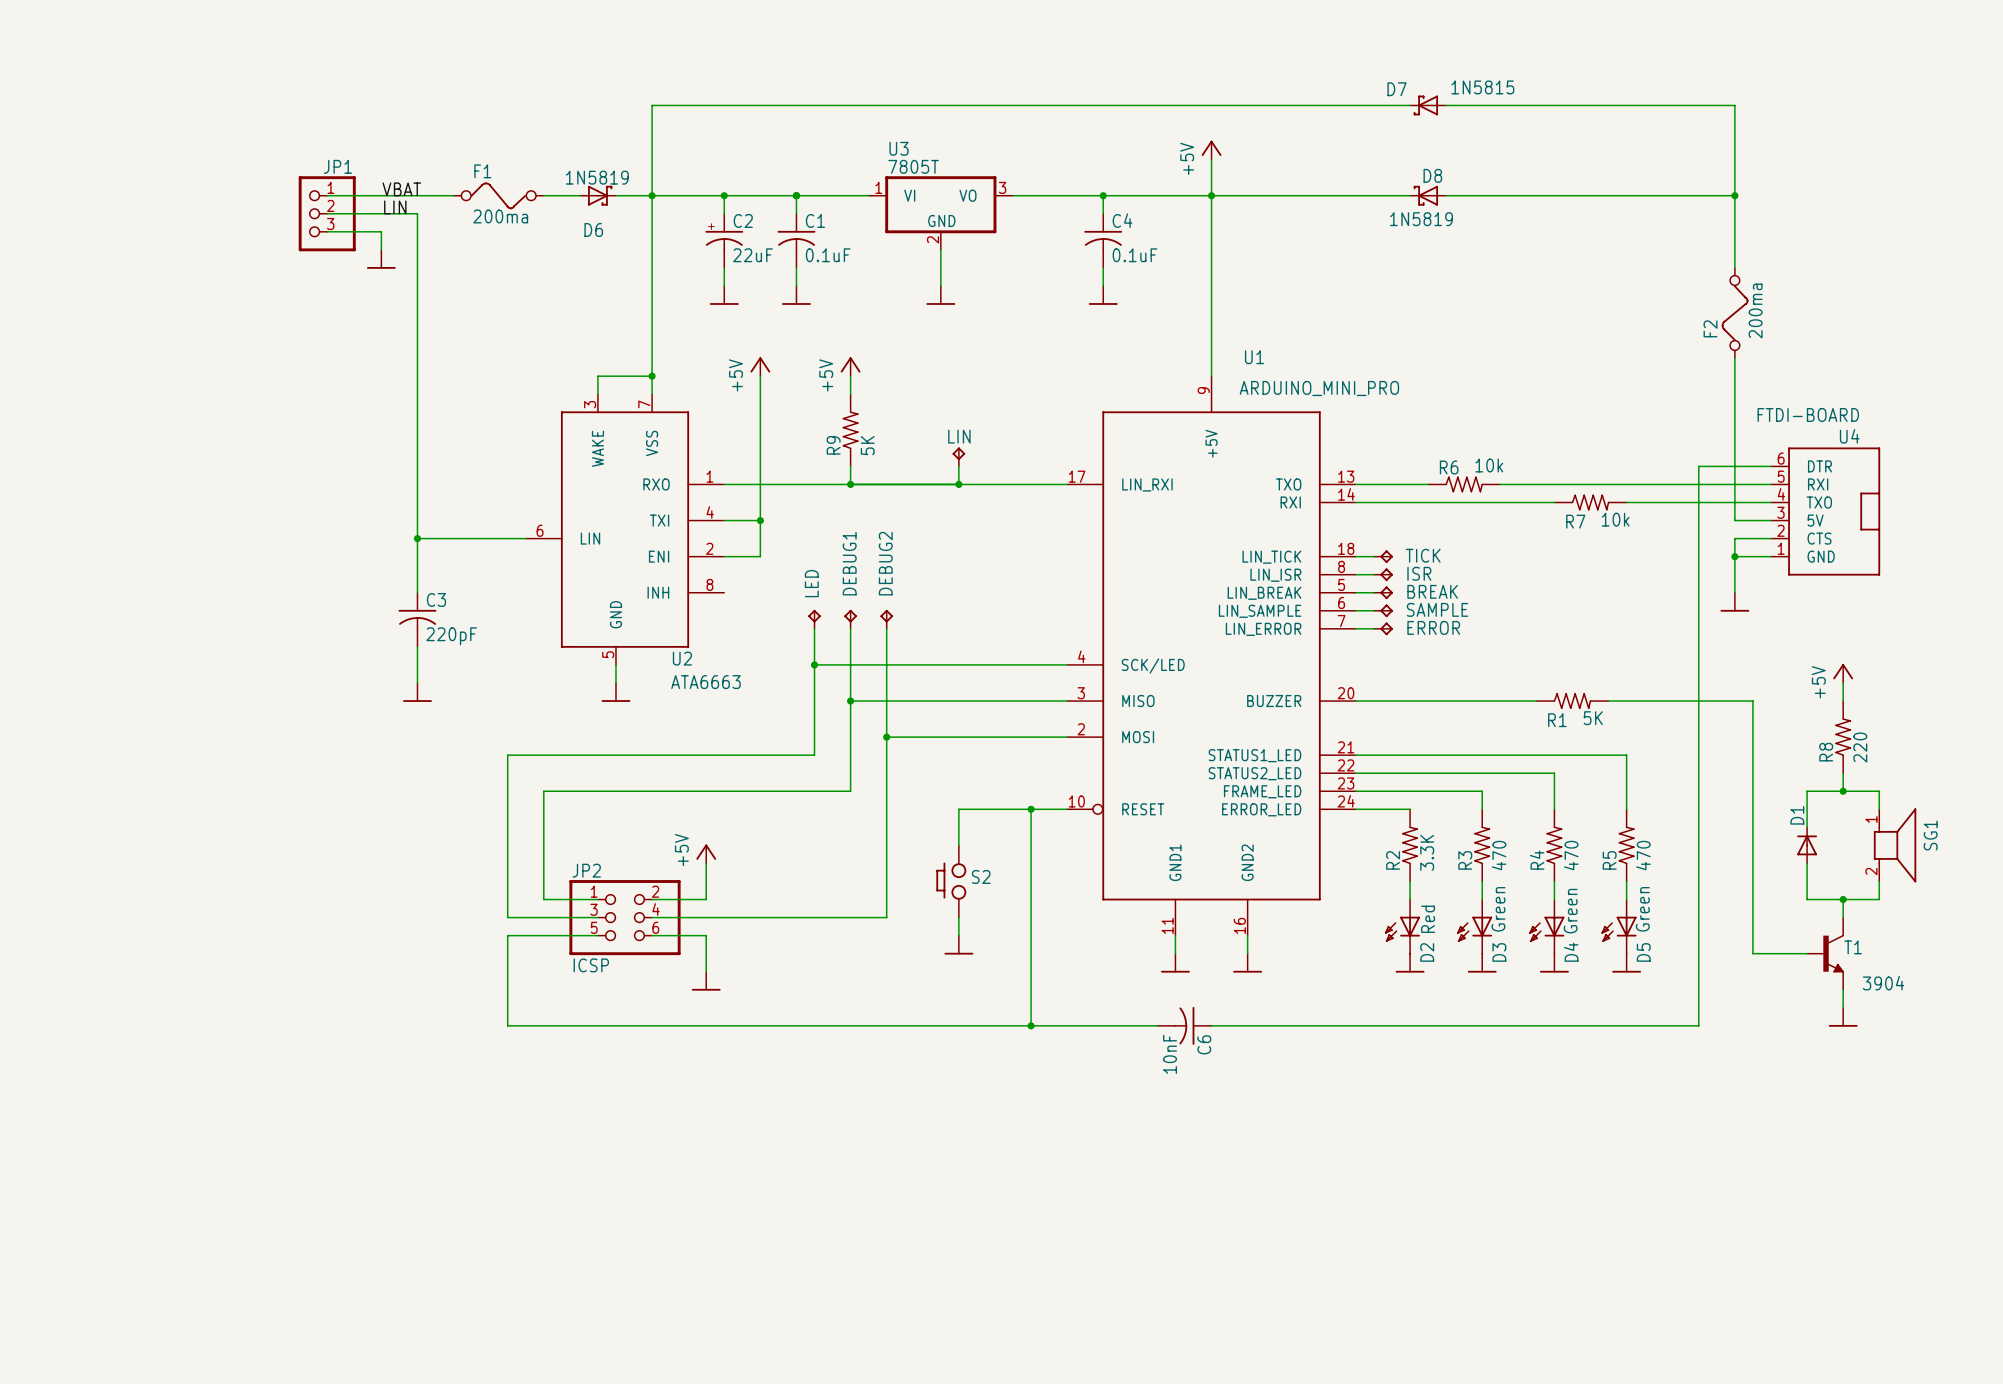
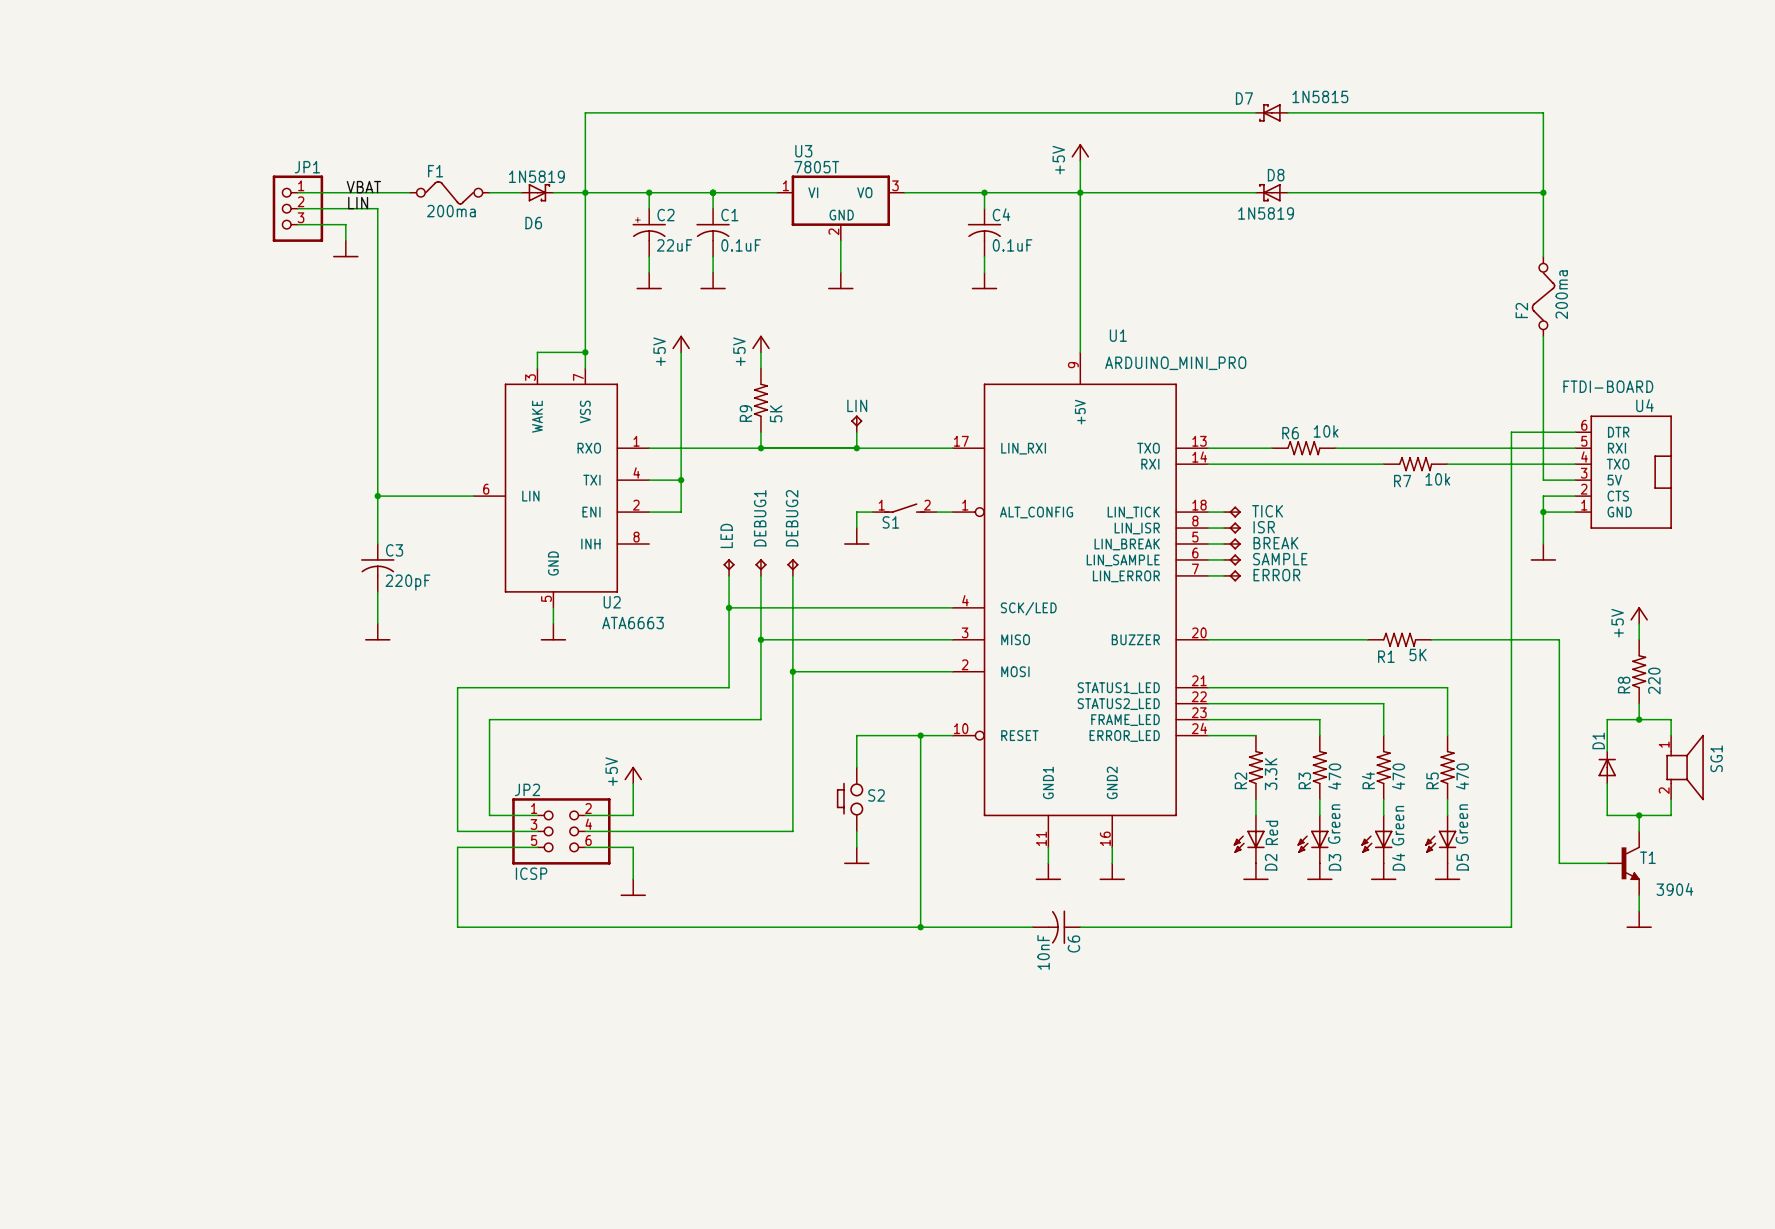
U1 symbol: [1067, 376, 1356, 936] -> [952, 352, 1209, 848]
S1: none -> (904, 508)
wire: none -> (872, 512) (856, 512) (856, 528)
wire: none -> (936, 512) (952, 512)
power symbol: none -> (856, 536)

